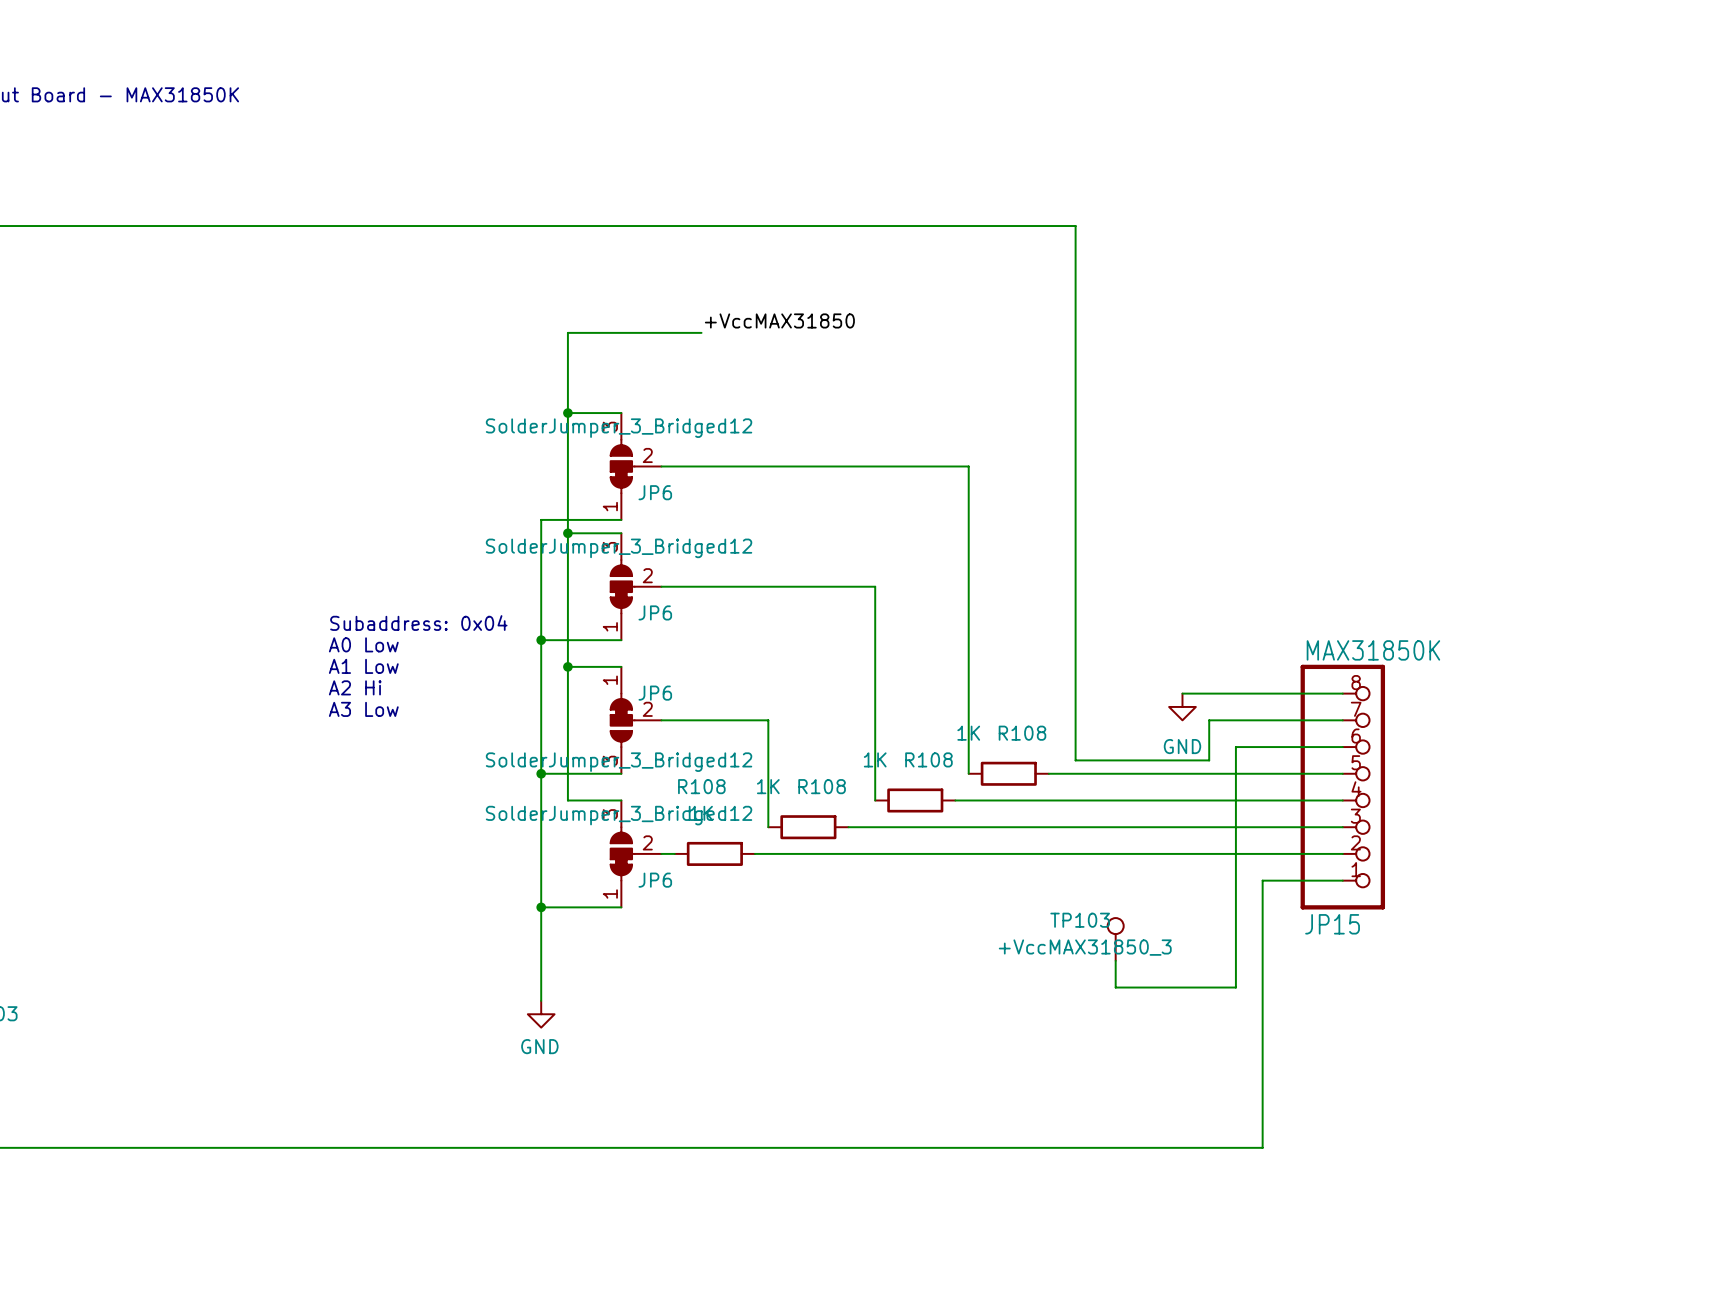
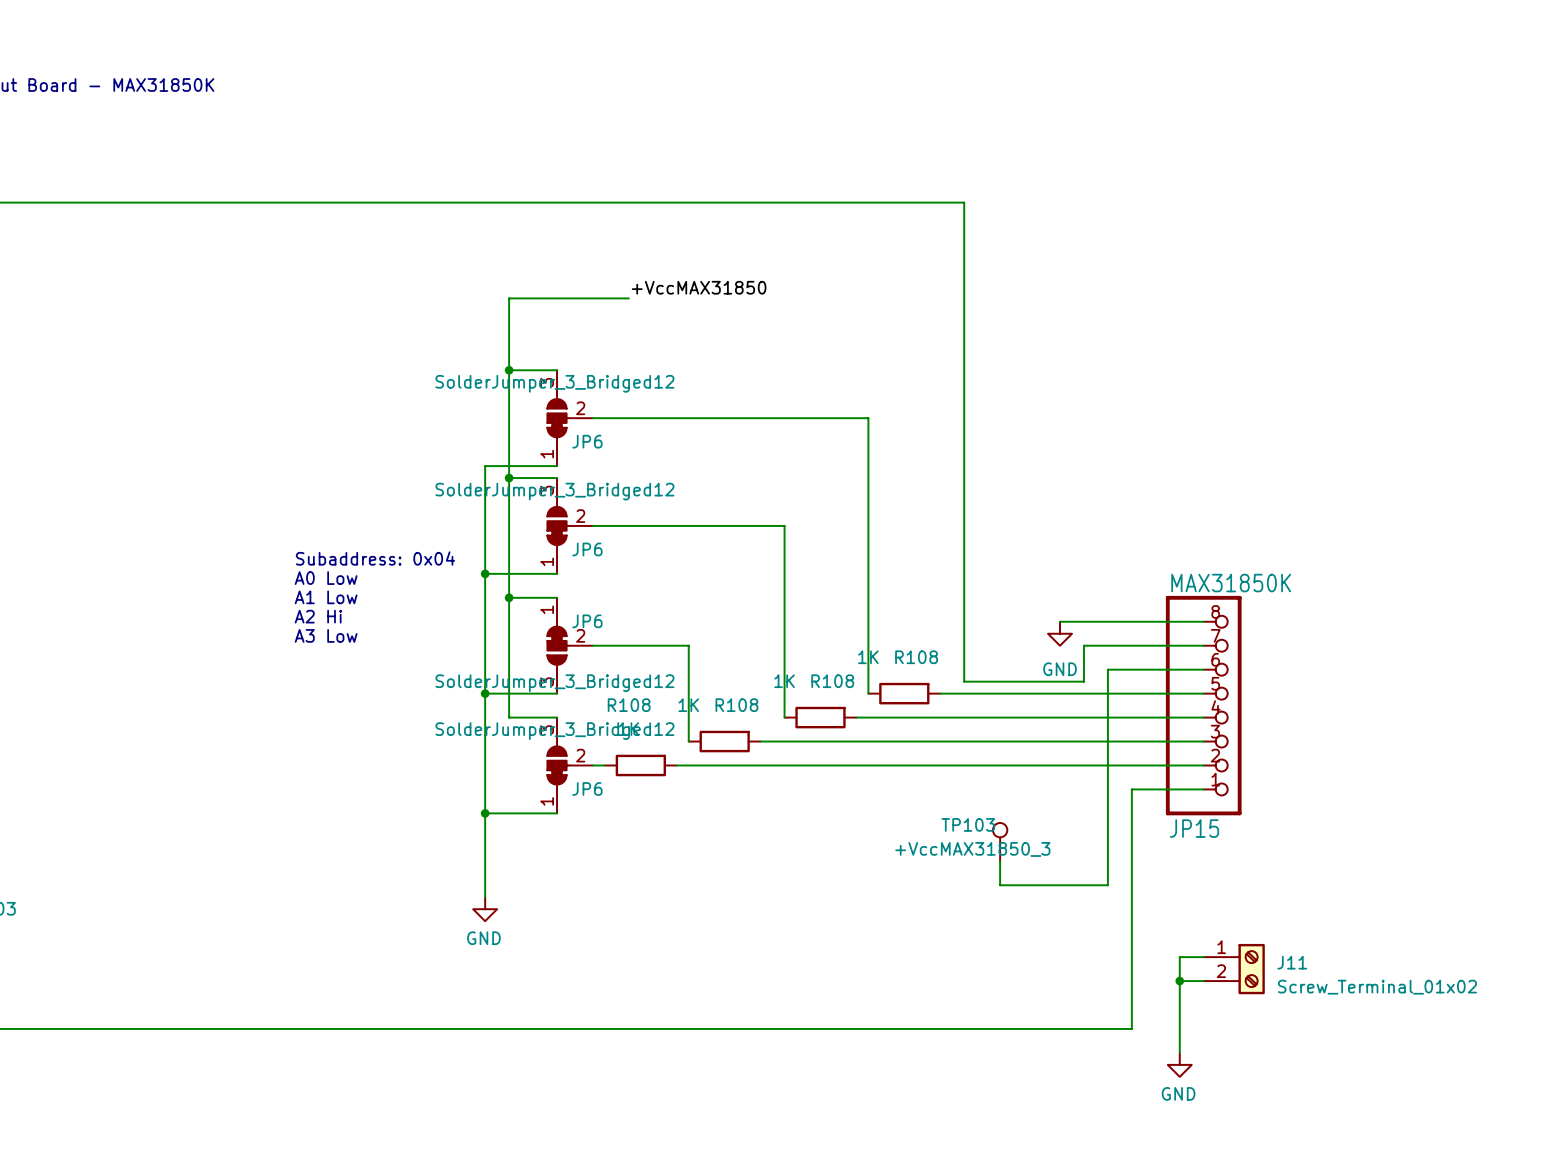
wire: none -> (1203, 957) (1179, 957) (1179, 1052)
J11: none -> Screw_Terminal_01x02 (1234, 969)
wire: none -> (1179, 981) (1203, 981)
junction: none -> (1179, 981)
power symbol: none -> GND (1179, 1064)

